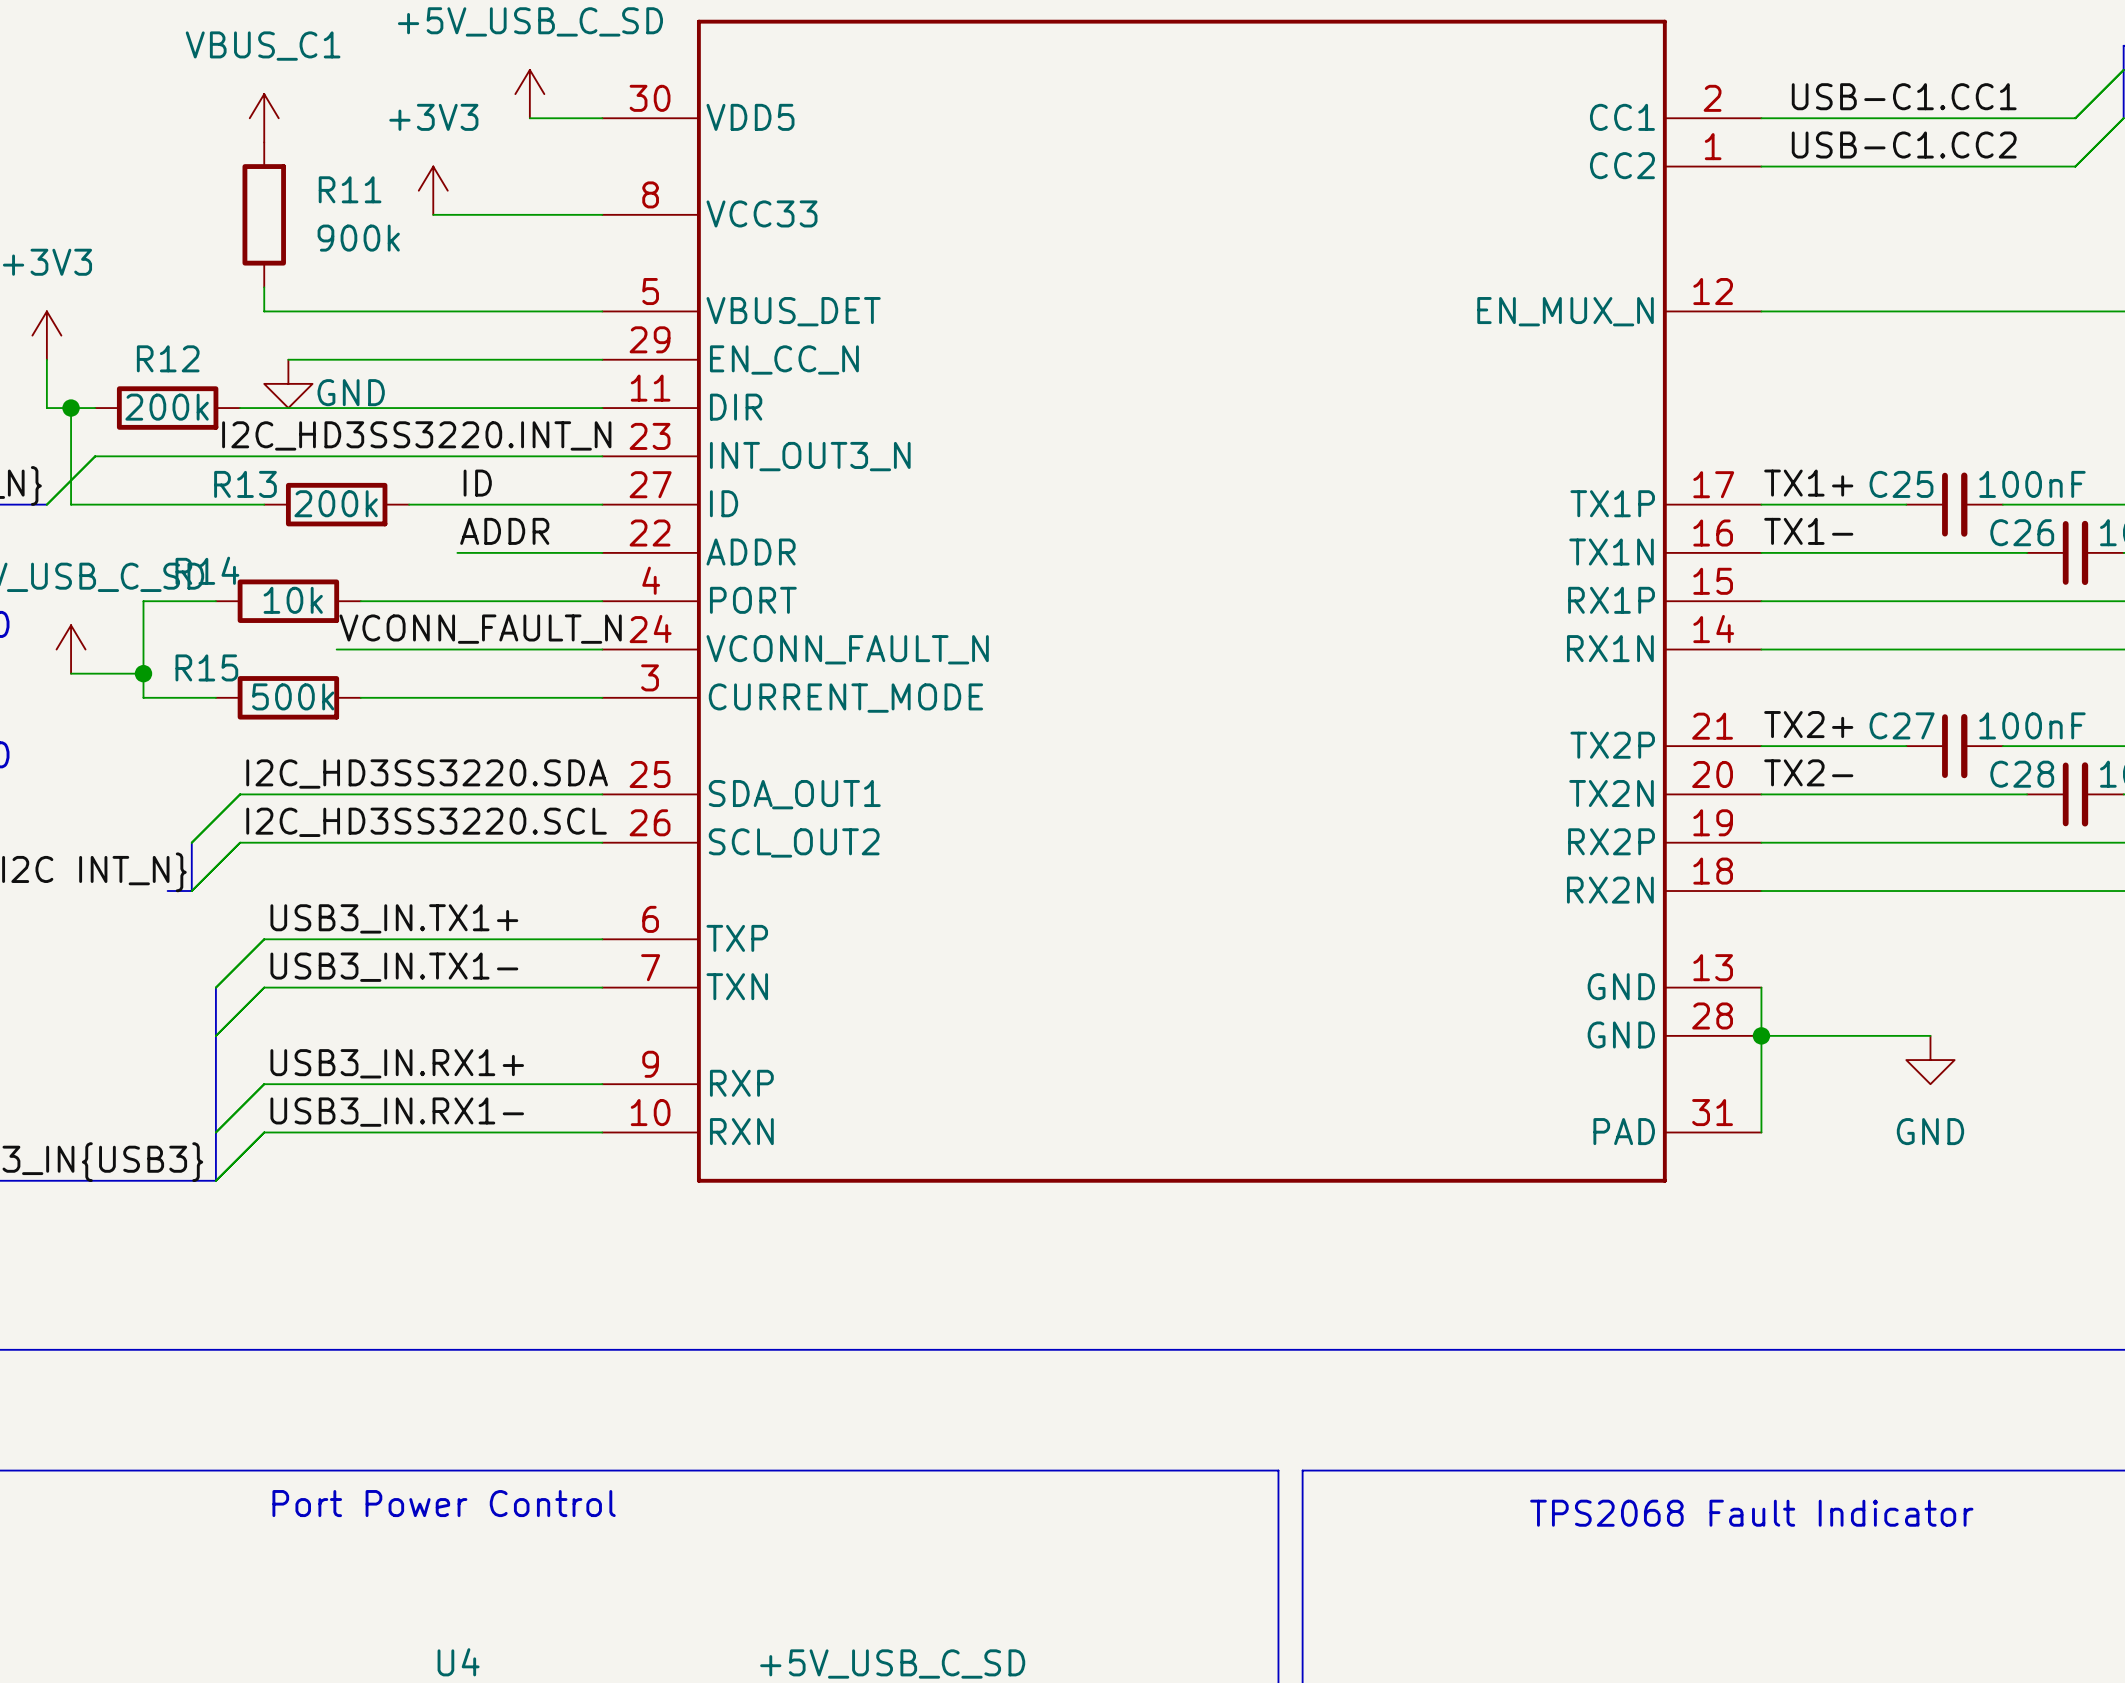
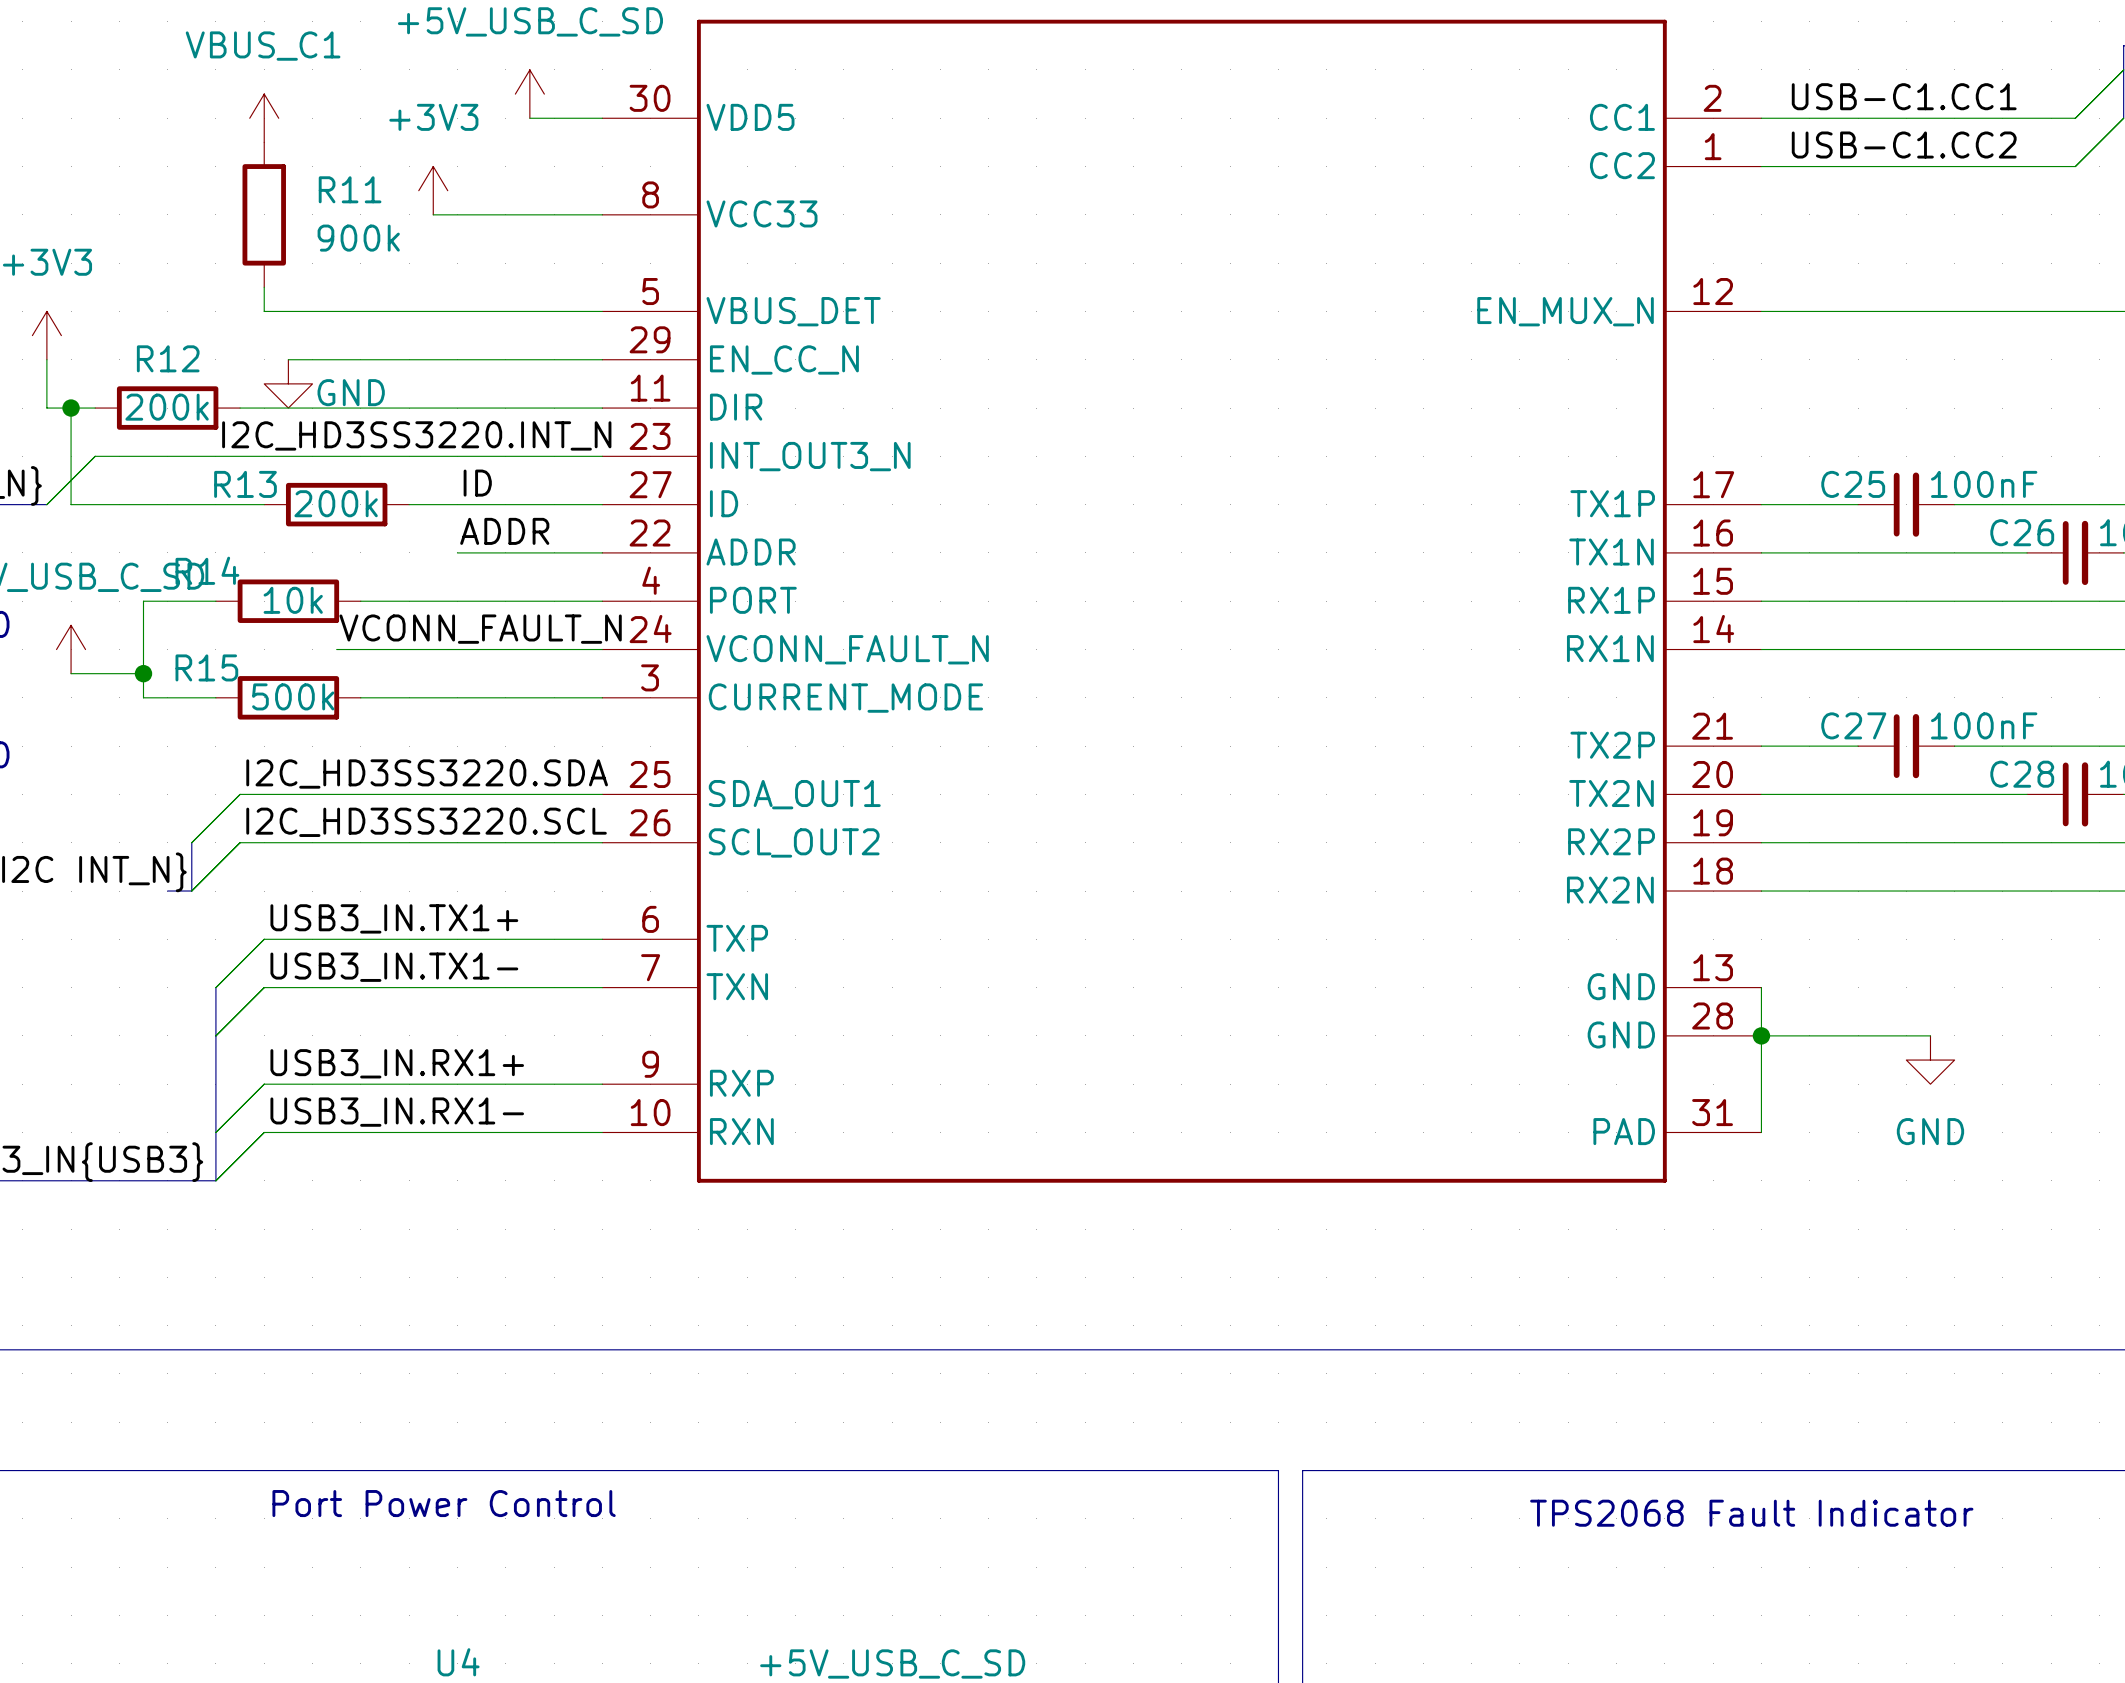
label: TX1+ (1808, 483) -> none
C25 position: (1954, 504) -> (1906, 504)
label: TX1- (1808, 531) -> none
label: TX2+ (1808, 724) -> none
C27 position: (1954, 746) -> (1906, 746)
label: TX2- (1808, 772) -> none

